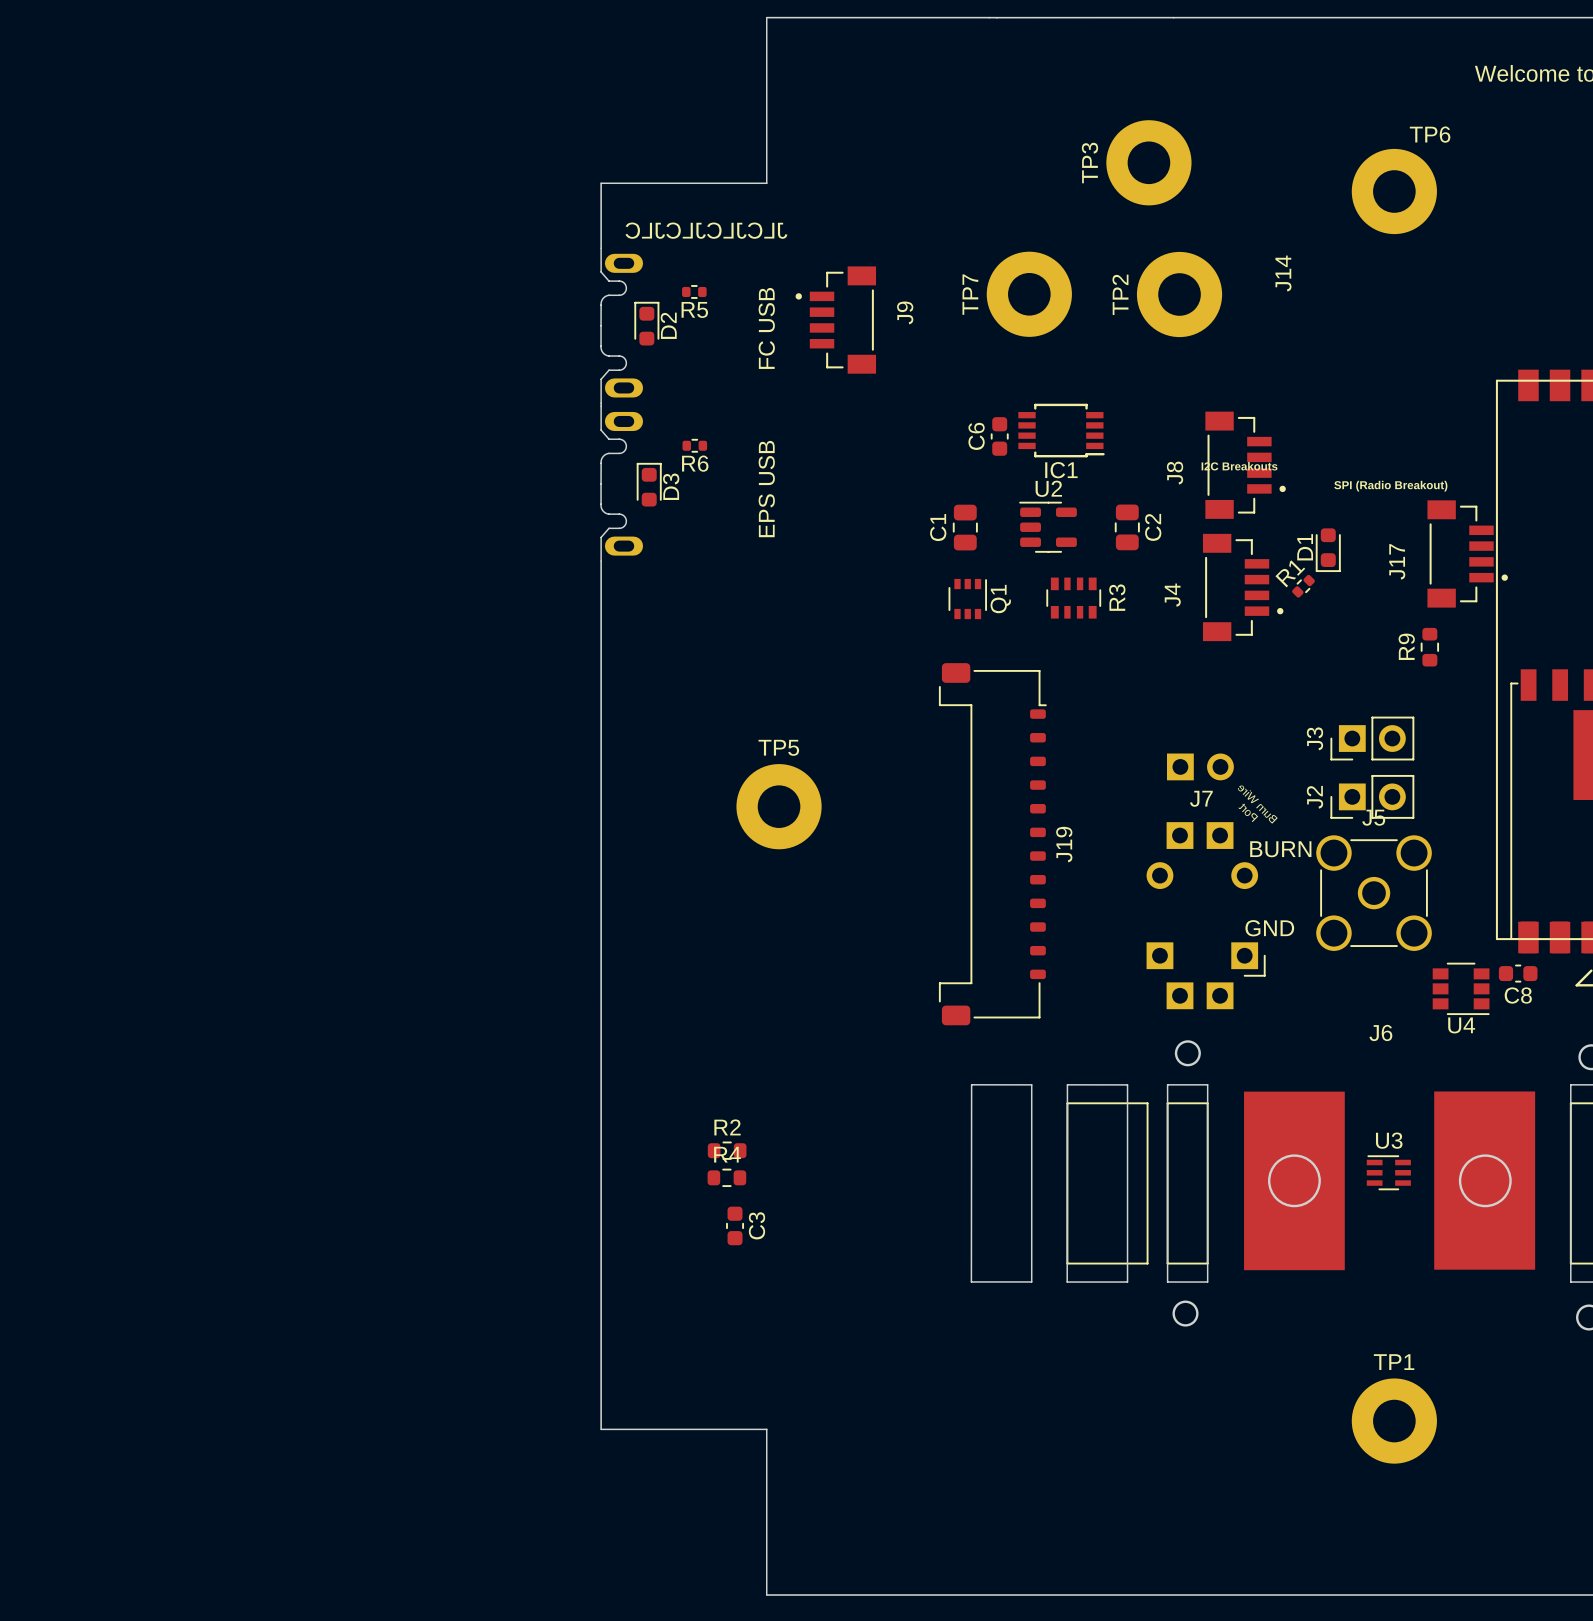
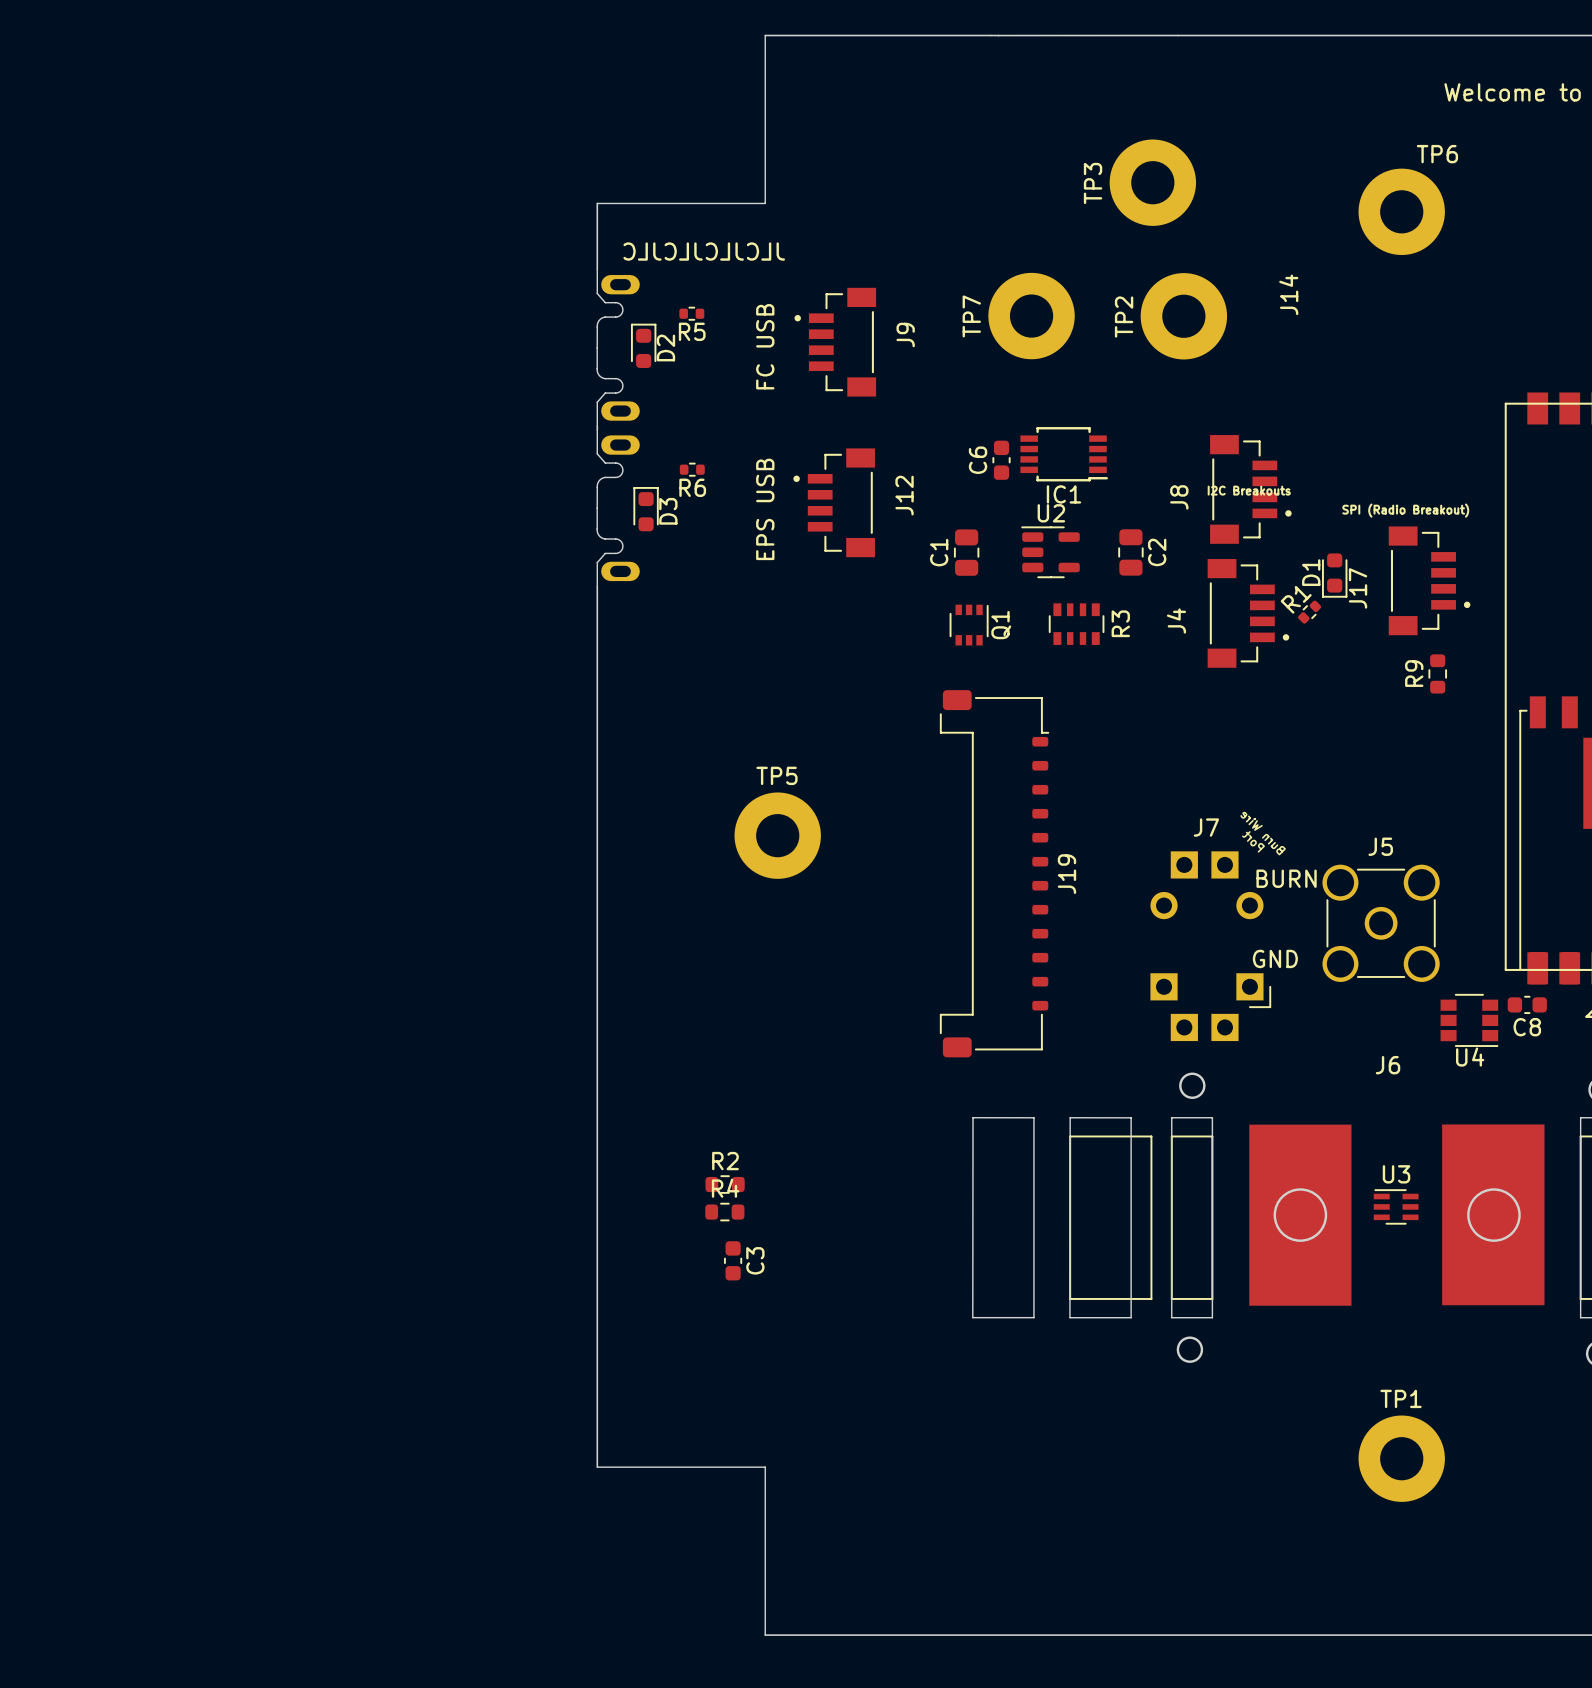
J12: none -> (834, 502)
J17 position: (1467, 553) -> (1429, 580)
J3: (1372, 738) -> none
part: (1200, 766) -> none
J2: (1372, 796) -> none

